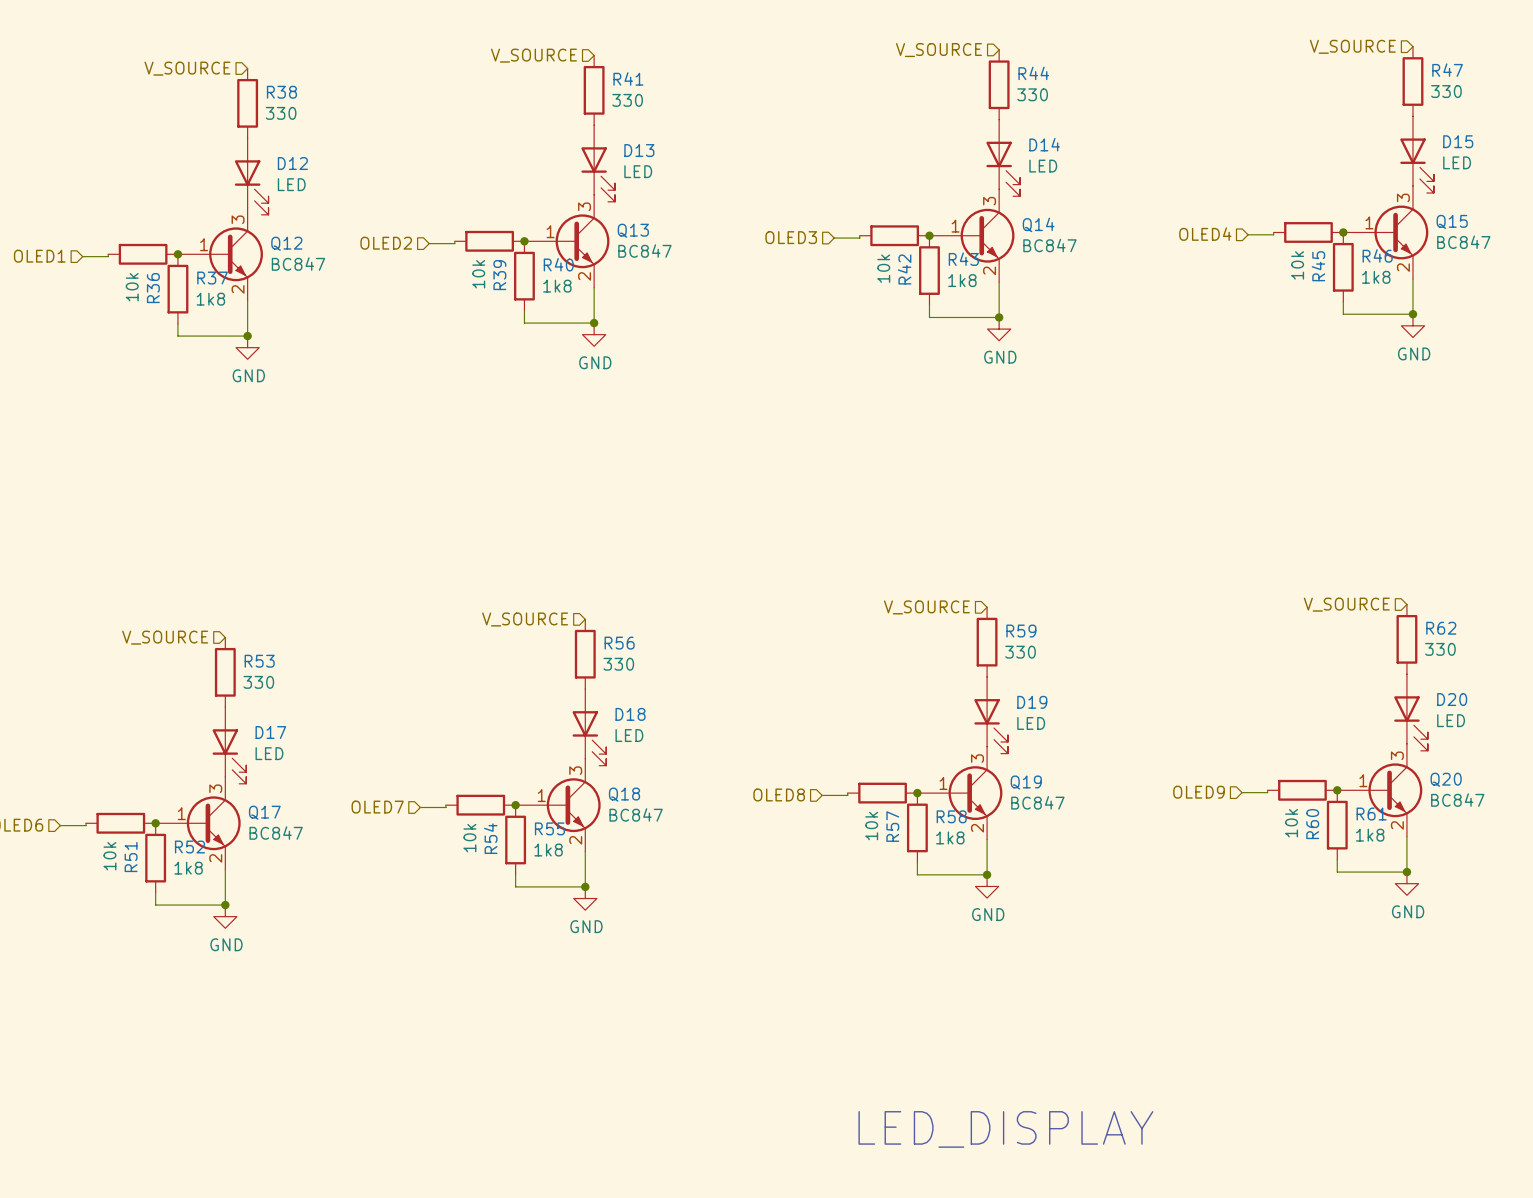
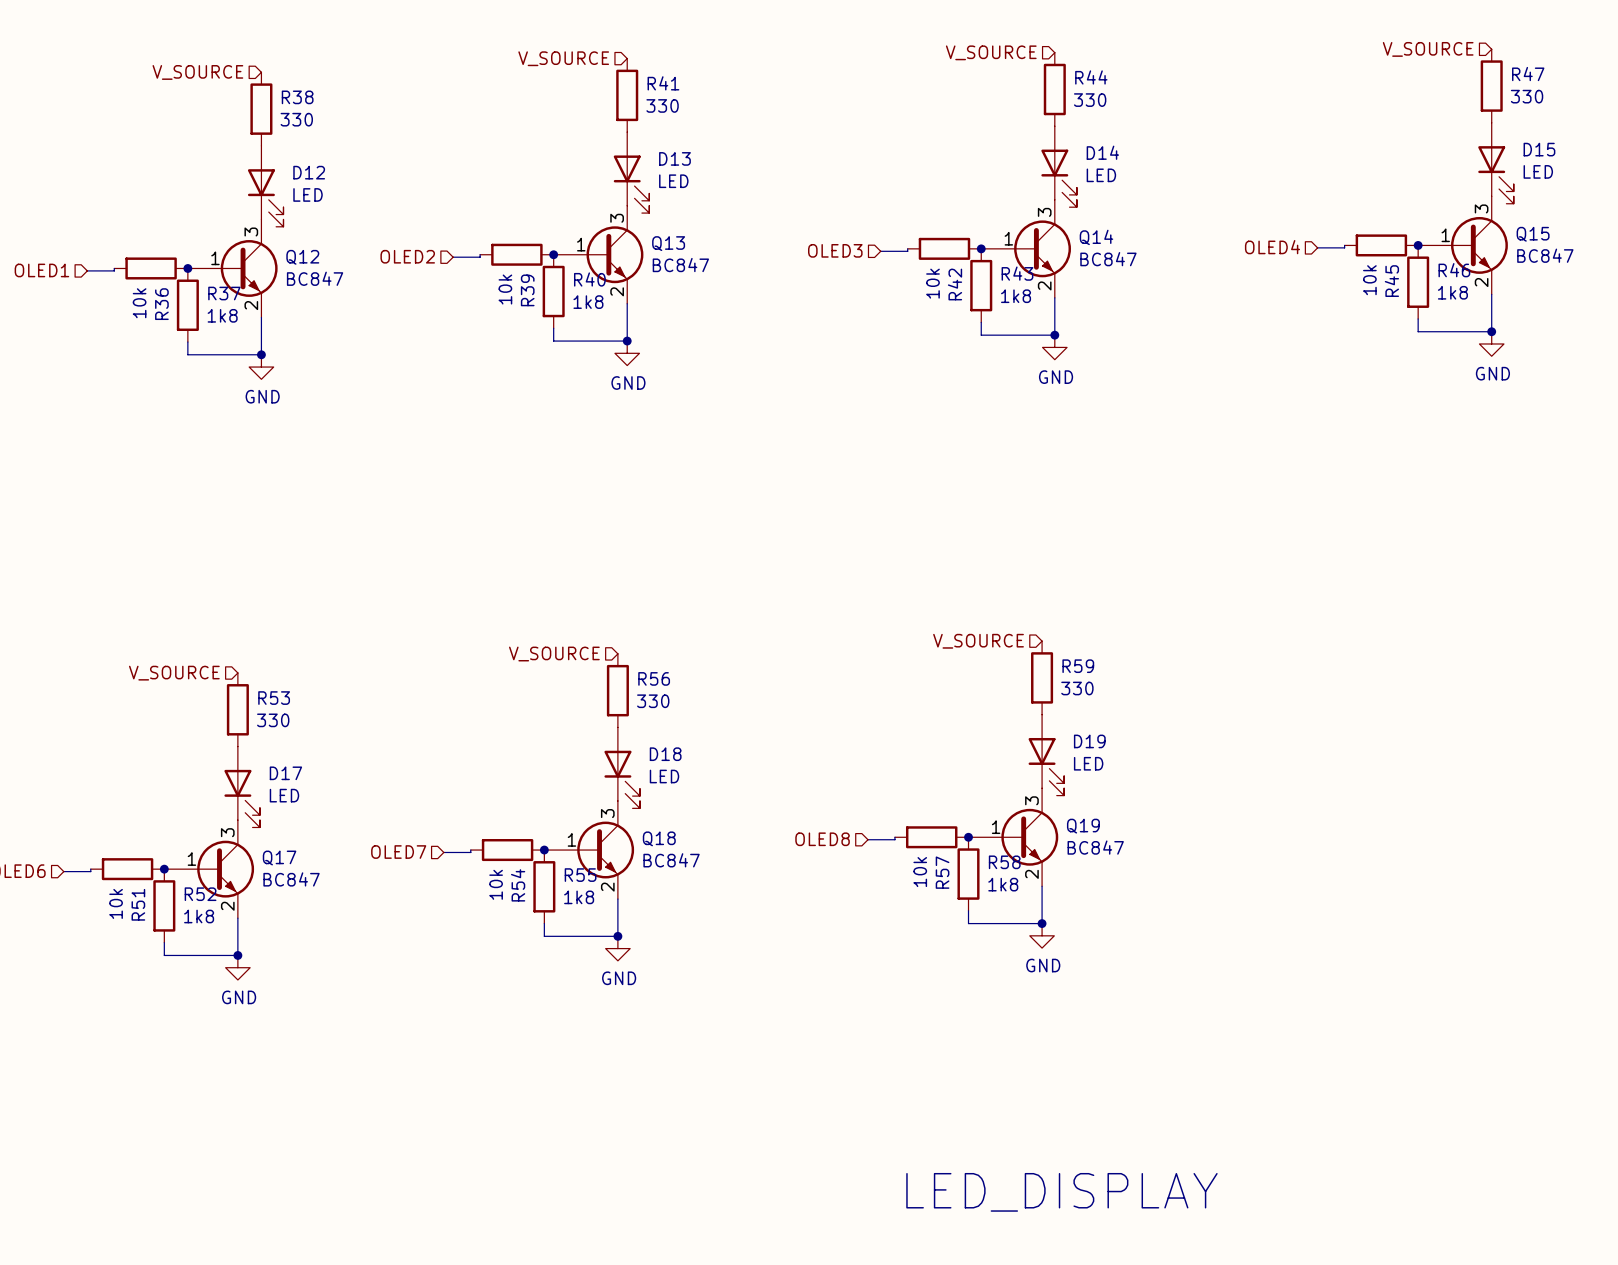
hierarchical label: V_SOURCE (1346, 604) -> none
R62: 330 (1406, 639) -> none
D20: LED (1411, 712) -> none
wire: (1267, 790) (1267, 792) (1242, 792) -> none
R60: 10k (1302, 790) -> none
junction: (1337, 790) -> none
Q20: BC847 (1379, 790) -> none
hierarchical label: OLED9 (1199, 792) -> none
R61: 1k8 (1337, 825) -> none
wire: (1406, 836) (1406, 872) (1337, 872) (1337, 859) -> none
junction: (1406, 872) -> none
power symbol: GND (1406, 883) -> none

